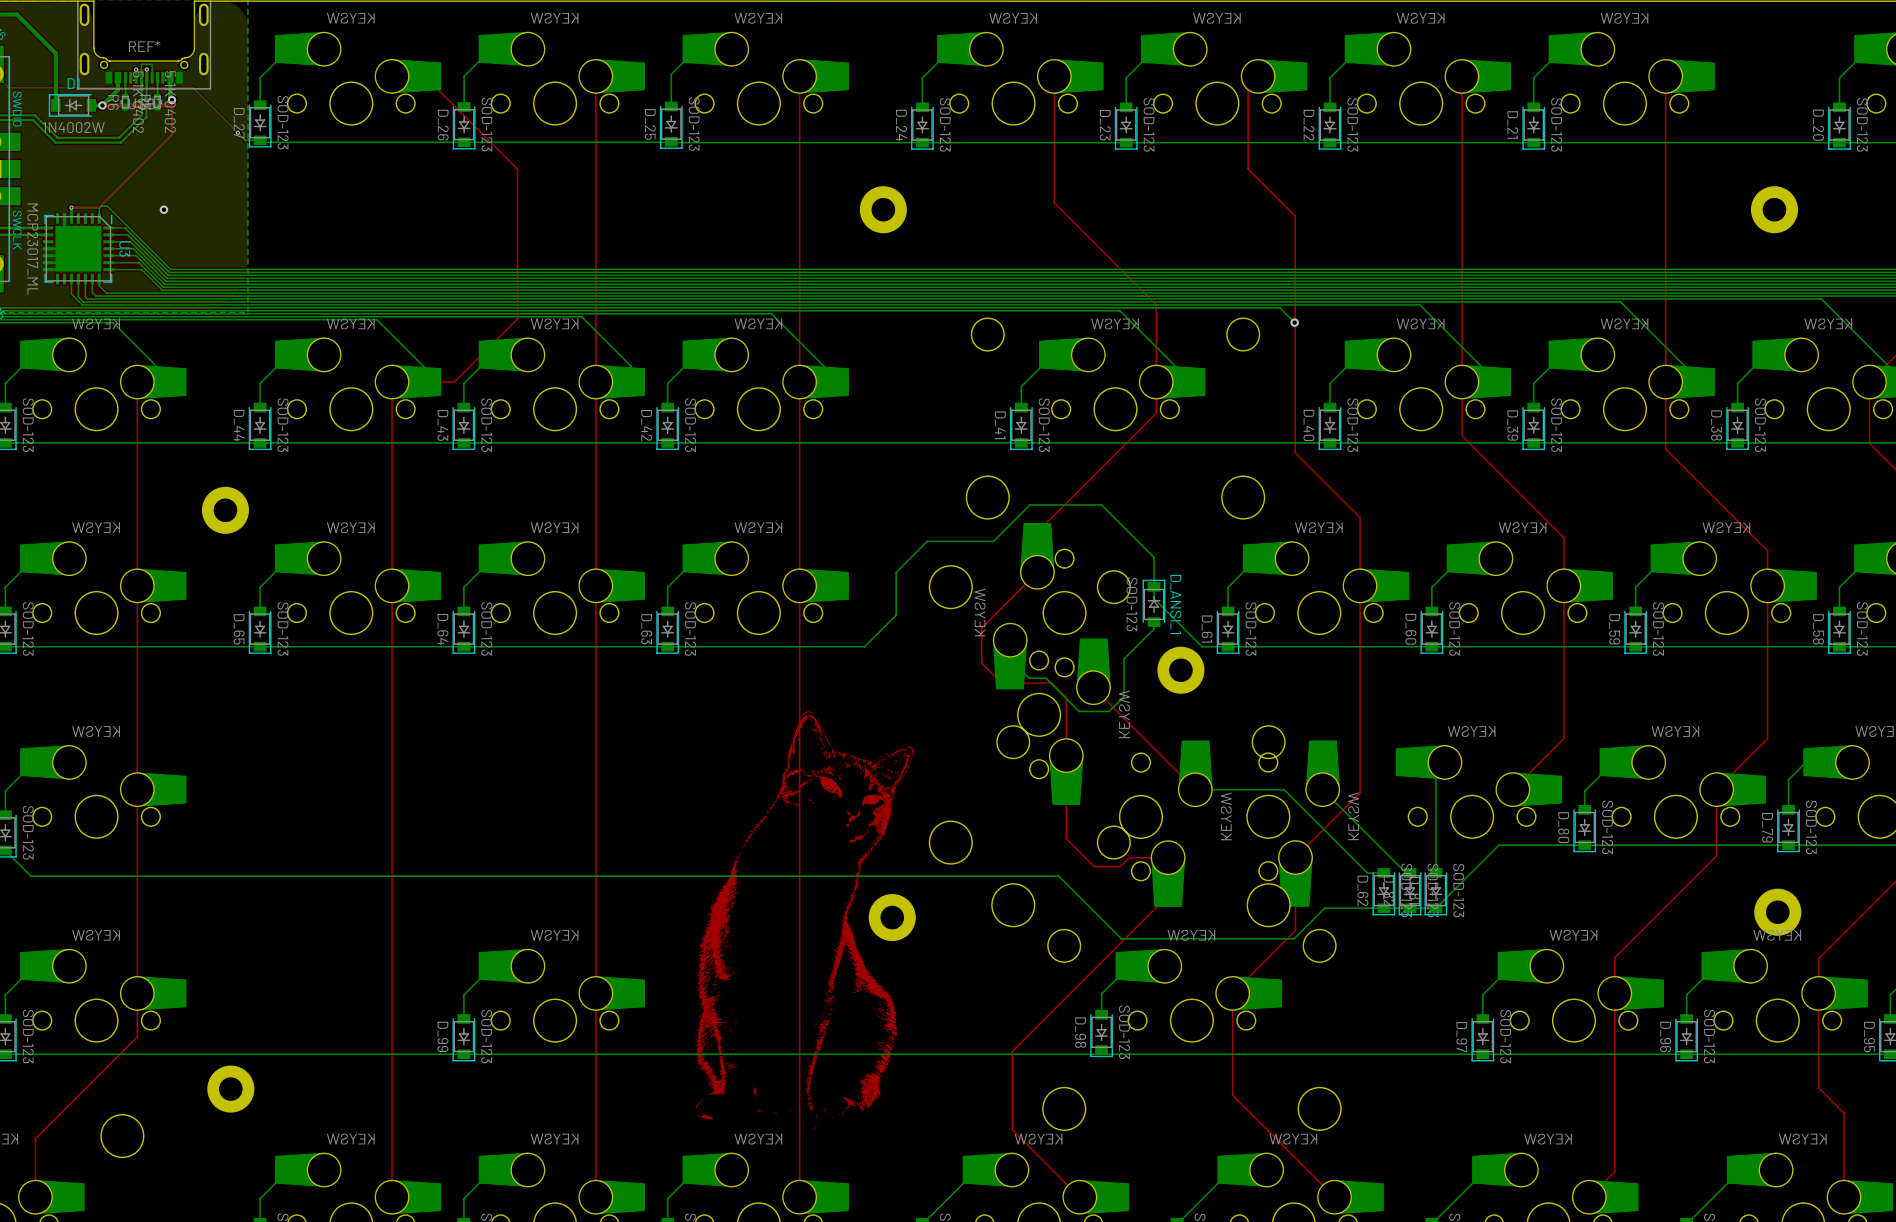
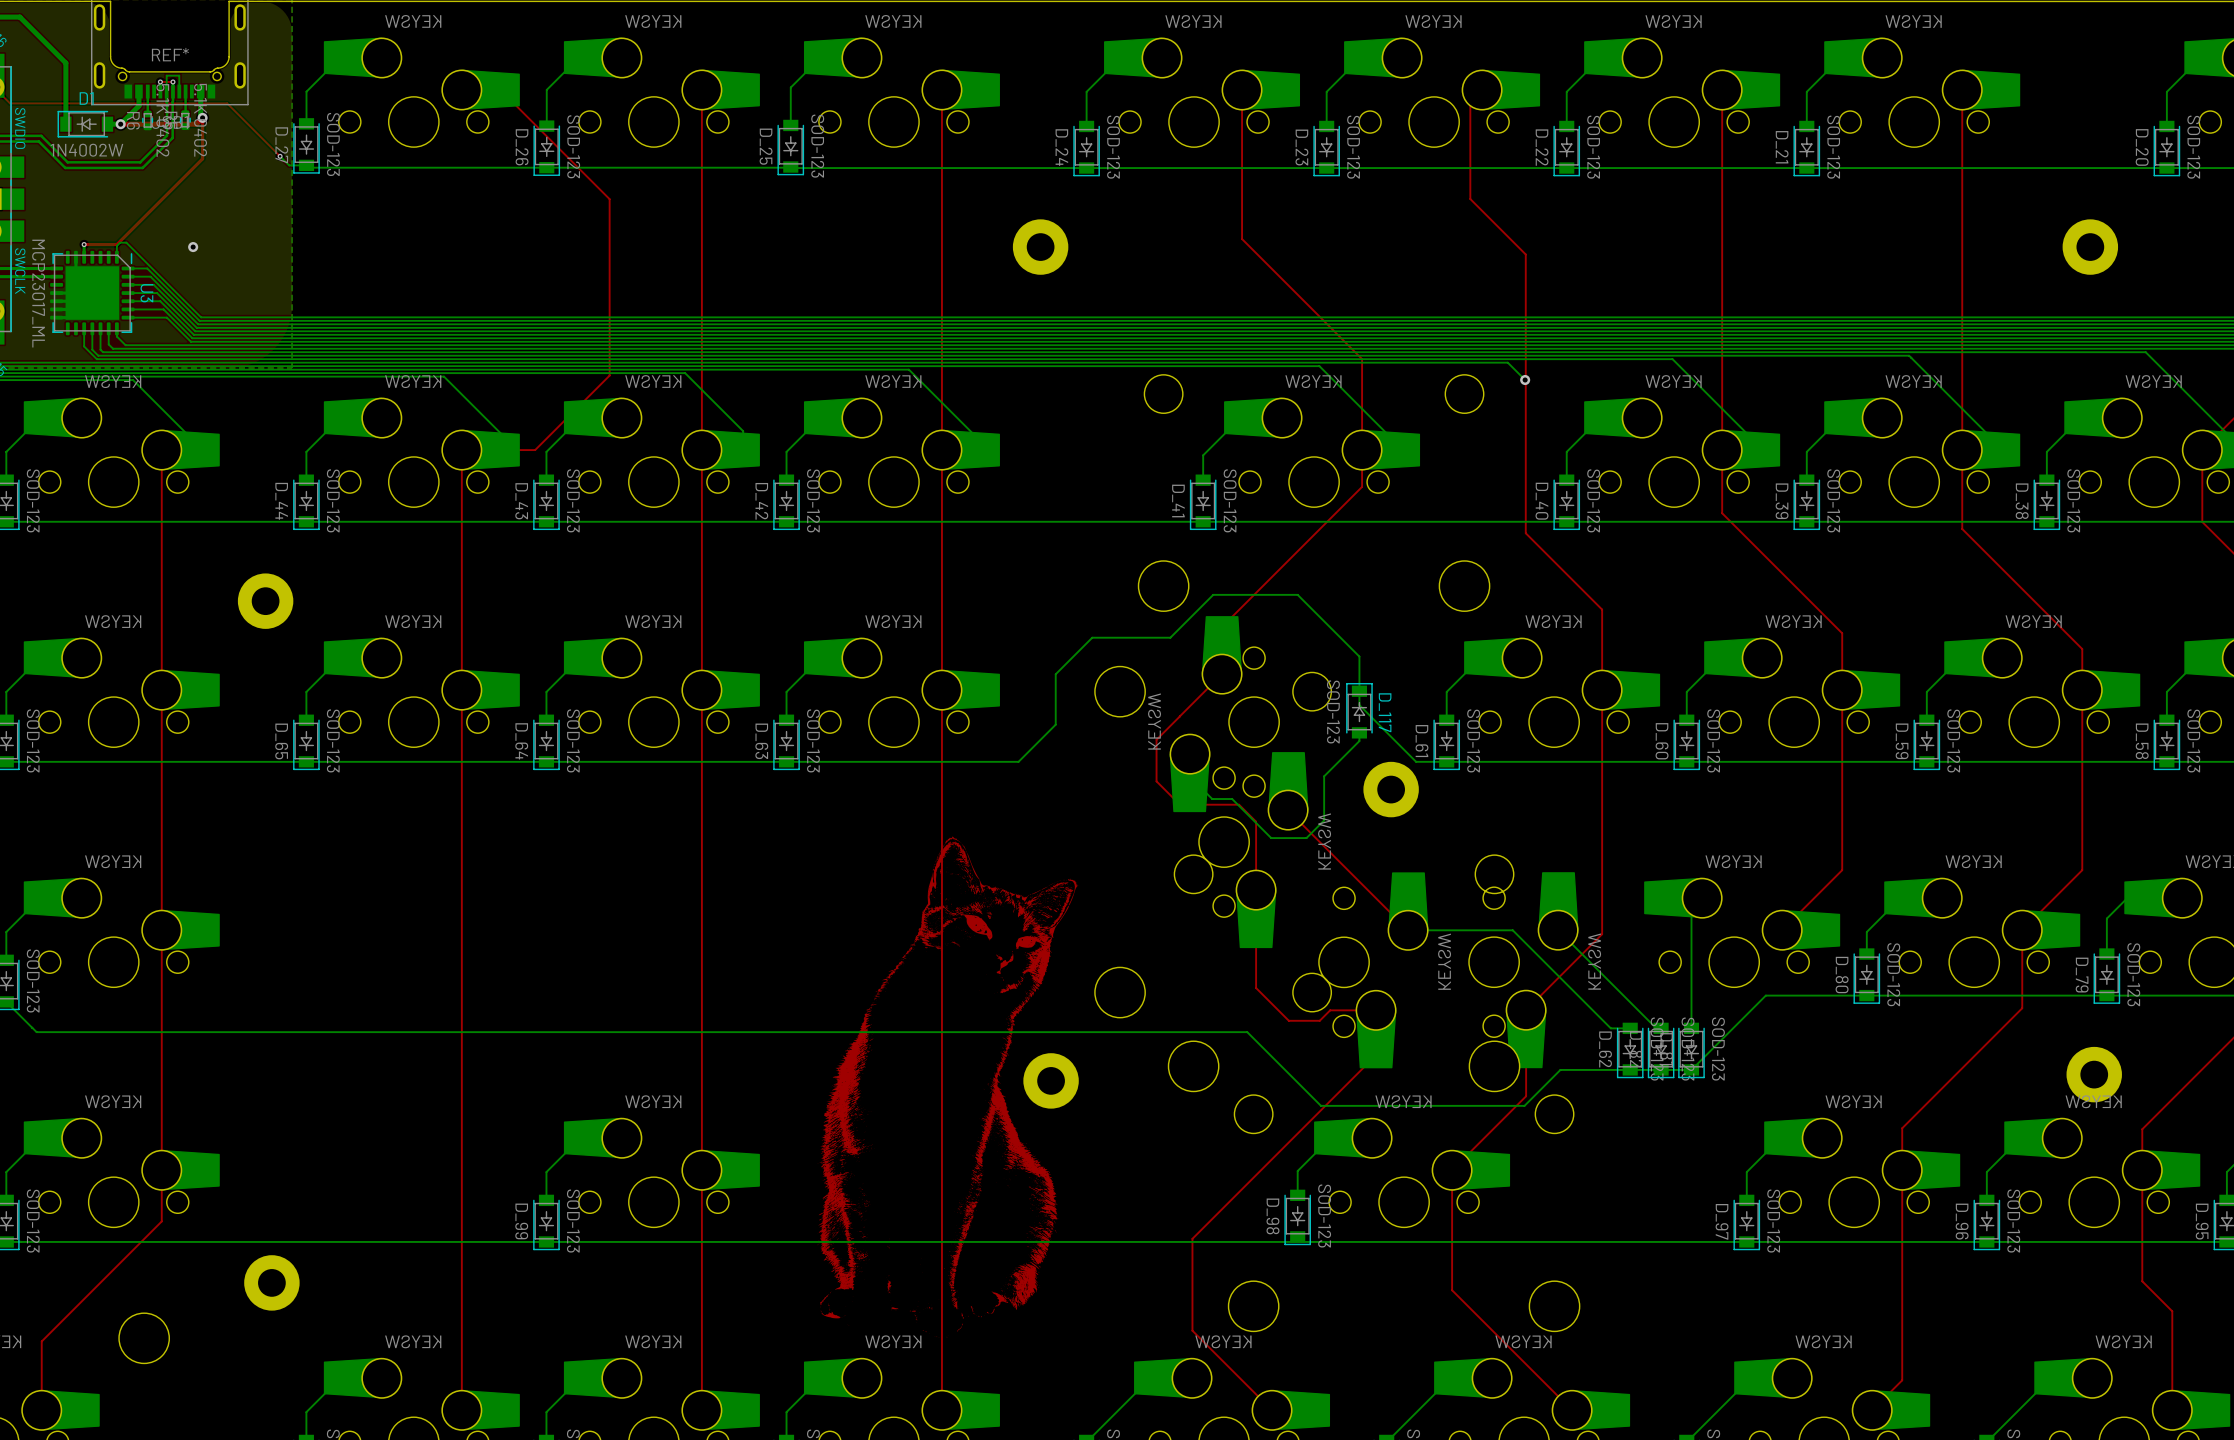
D_ANSI_1 name: D_ANSI_1 (1175, 604) -> D_117 (1385, 712)

